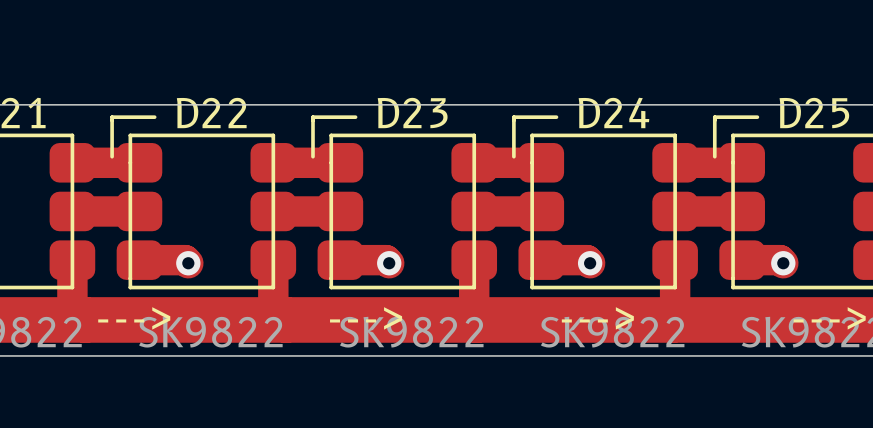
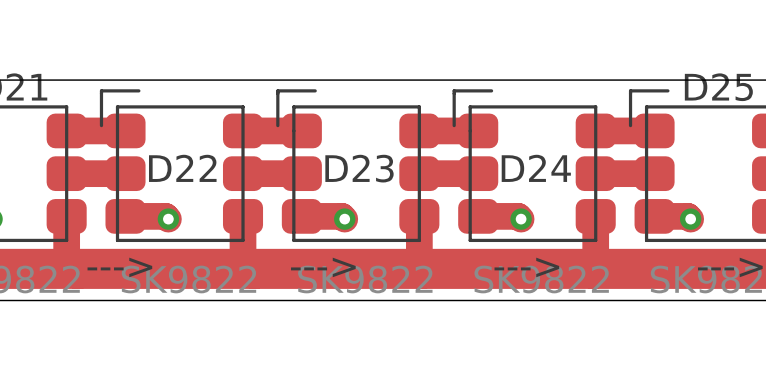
D24 name position: D24 (613, 112) -> D24 (536, 168)
D22 name position: D22 (211, 113) -> D22 (182, 168)
D23 name position: D23 (412, 113) -> D23 (359, 168)

